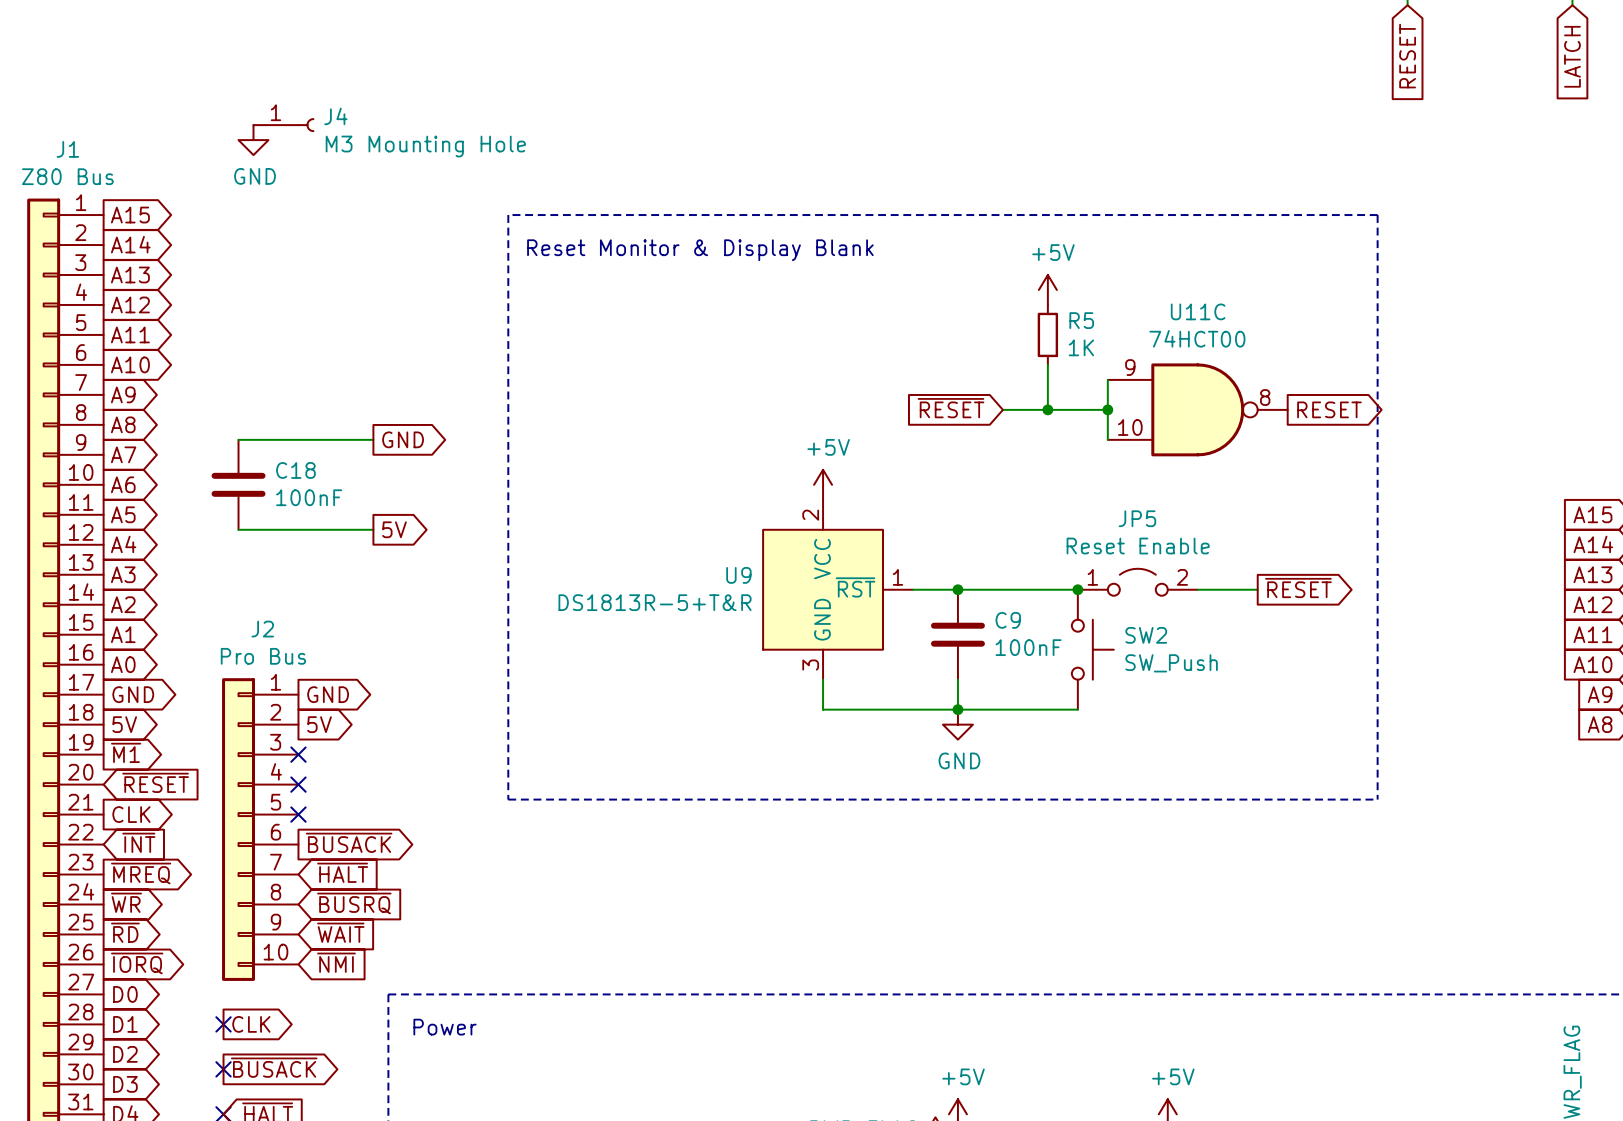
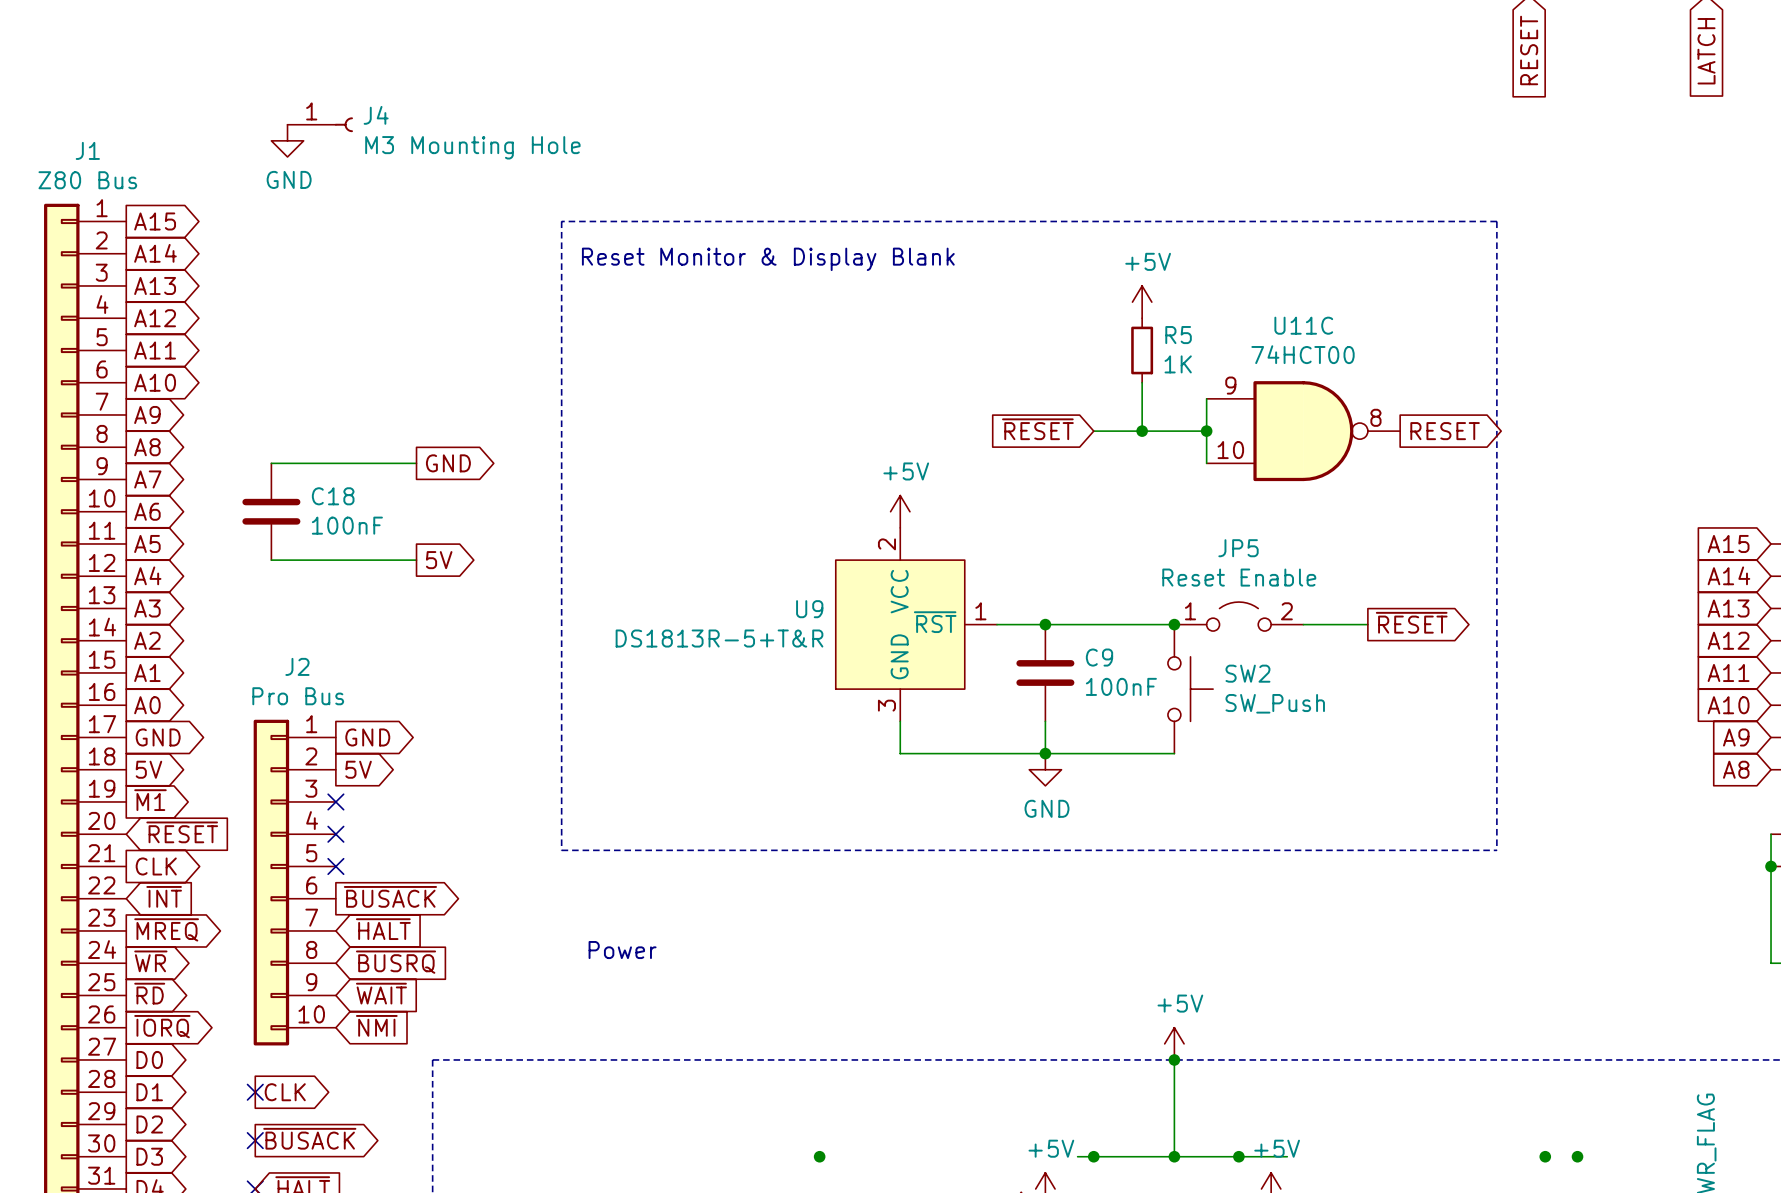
power symbol: none -> +5V (1174, 1043)
wire: none -> (1174, 1059) (1174, 1156)
junction: none -> (1174, 1059)
text position: Power (445, 1027) -> Power (622, 950)
junction: none -> (819, 1156)
wire: none -> (1077, 1156) (1287, 1156)
junction: none -> (1093, 1156)
junction: none -> (1174, 1156)
junction: none -> (1238, 1156)
junction: none -> (1545, 1156)
junction: none -> (1577, 1156)

